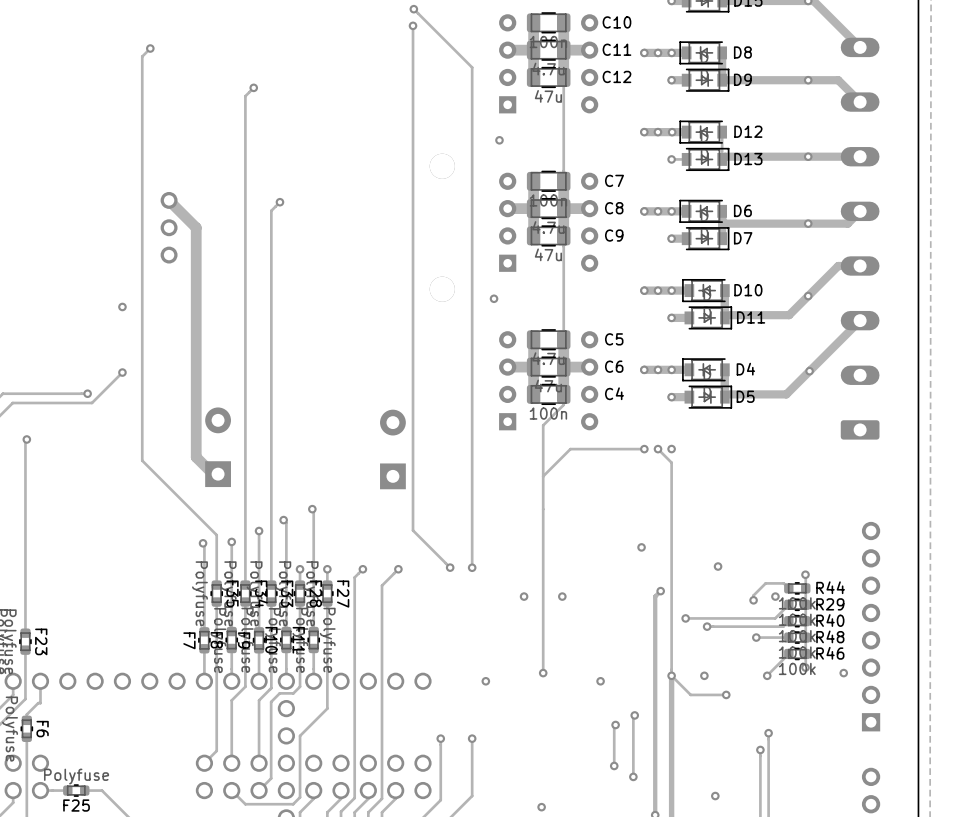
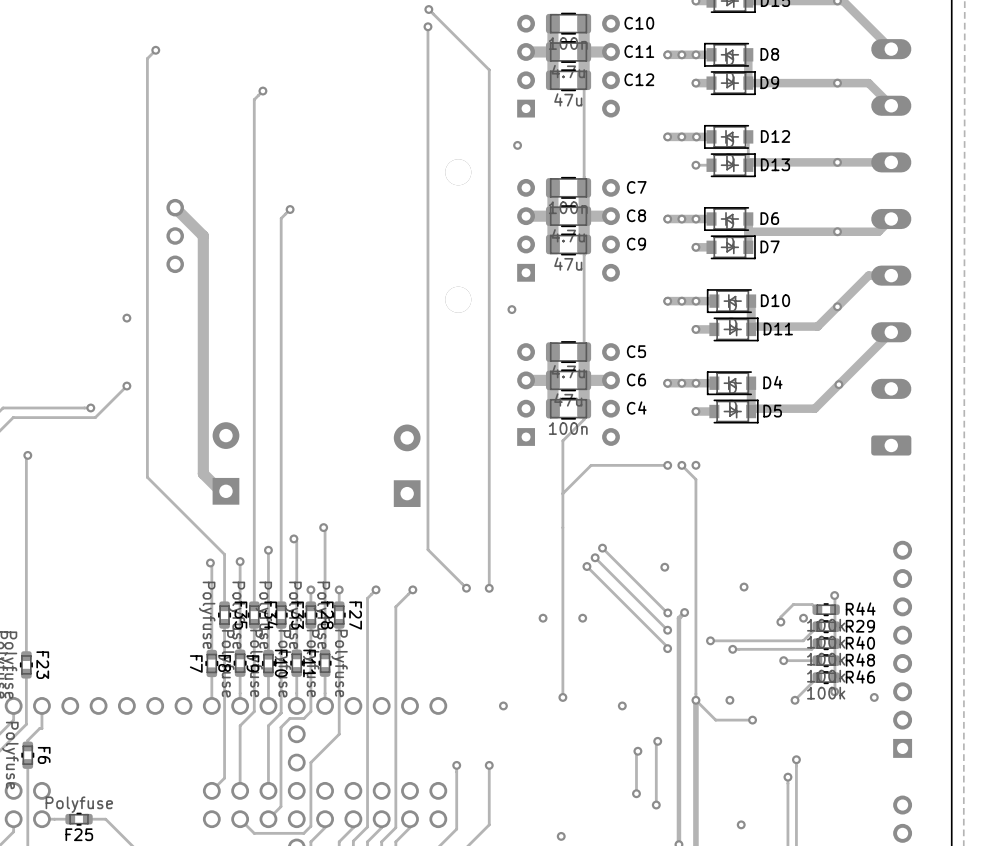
track: none -> (602, 548) (667, 612)
via: none -> (602, 548)
track: none -> (595, 557) (667, 630)
via: none -> (595, 557)
track: none -> (586, 566) (667, 648)
via: none -> (586, 566)
via: none -> (667, 612)
via: none -> (667, 630)
via: none -> (667, 648)

